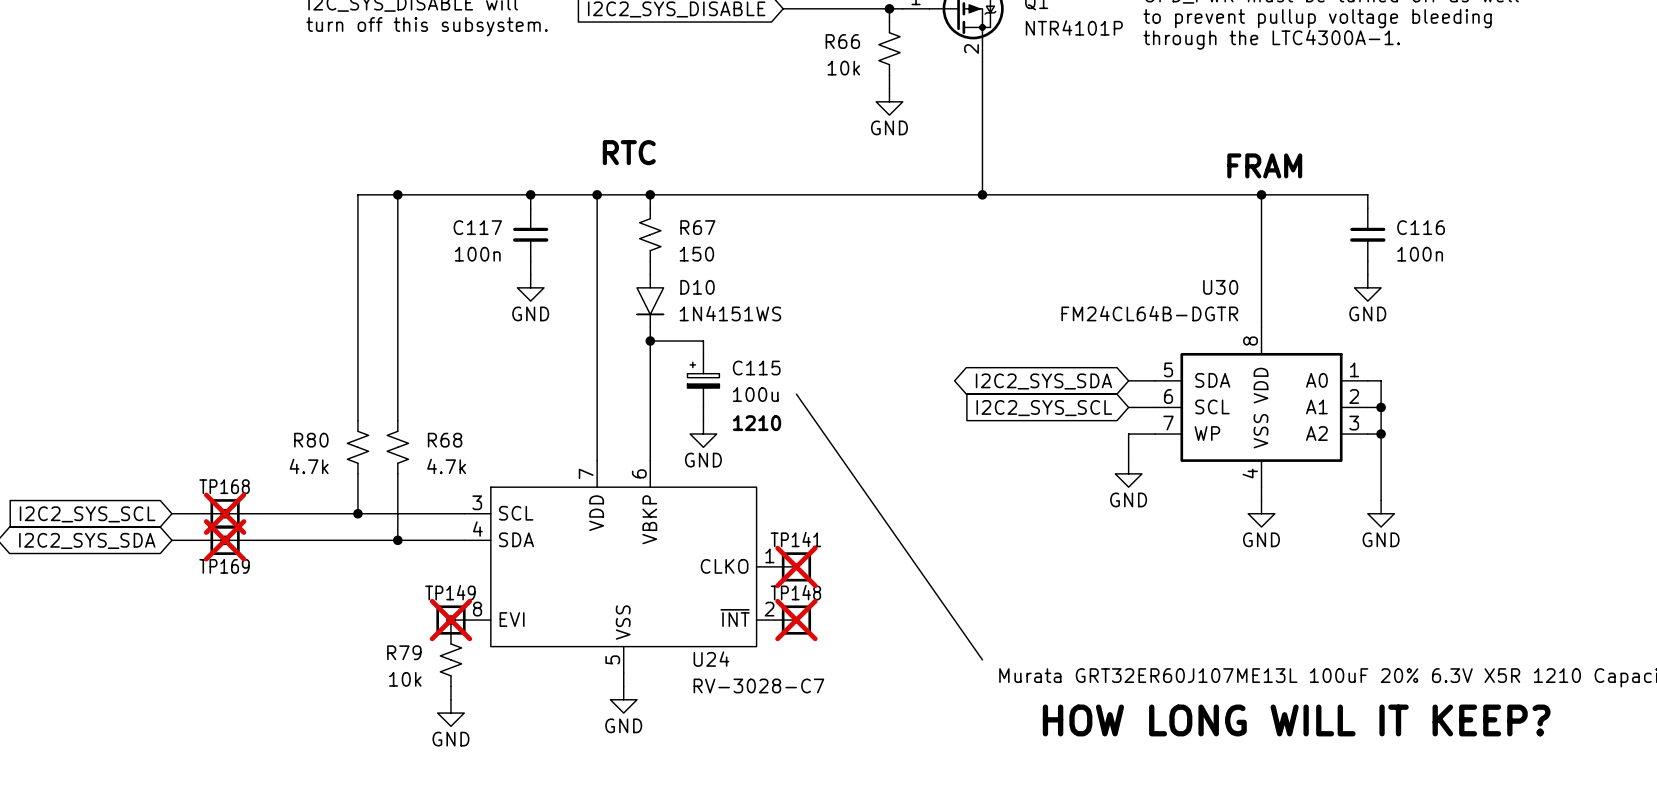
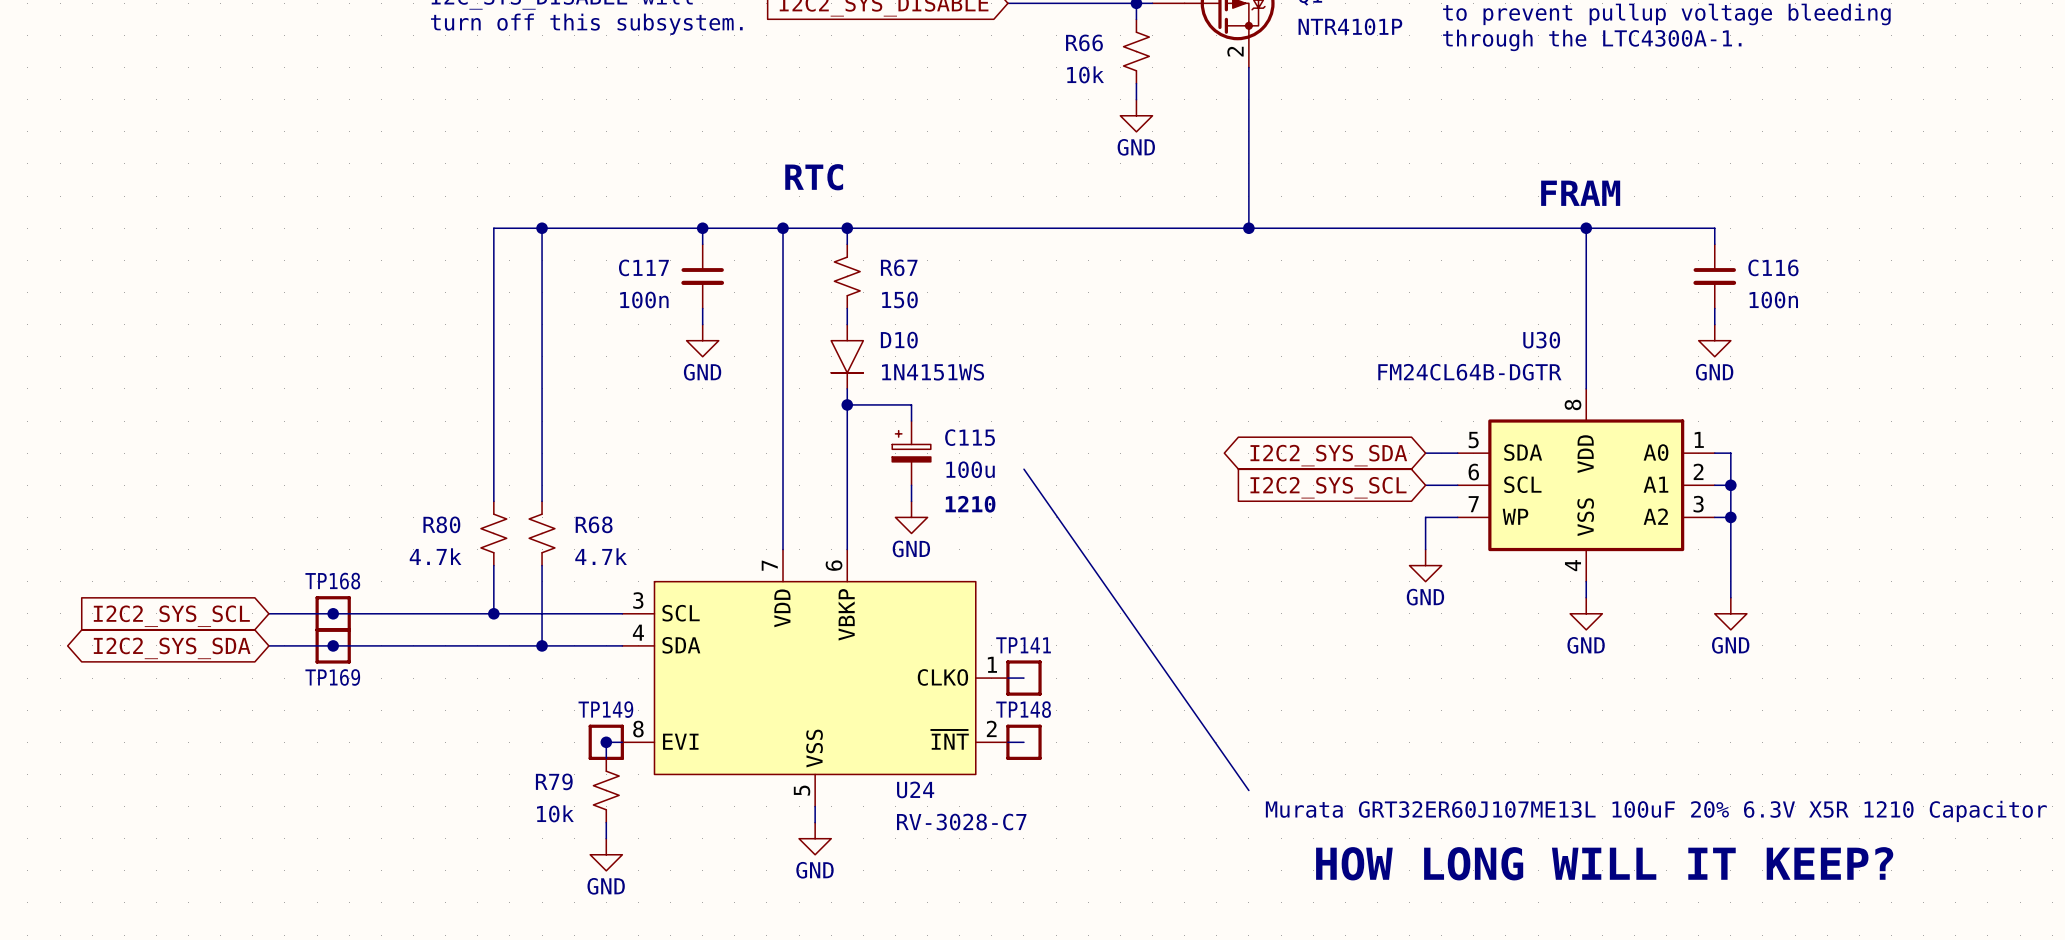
TP168 do-not-place cross: (225, 513) -> none
TP169 do-not-place cross: (225, 540) -> none
TP141 do-not-place cross: (796, 566) -> none
TP149 do-not-place cross: (450, 620) -> none
TP148 do-not-place cross: (796, 620) -> none

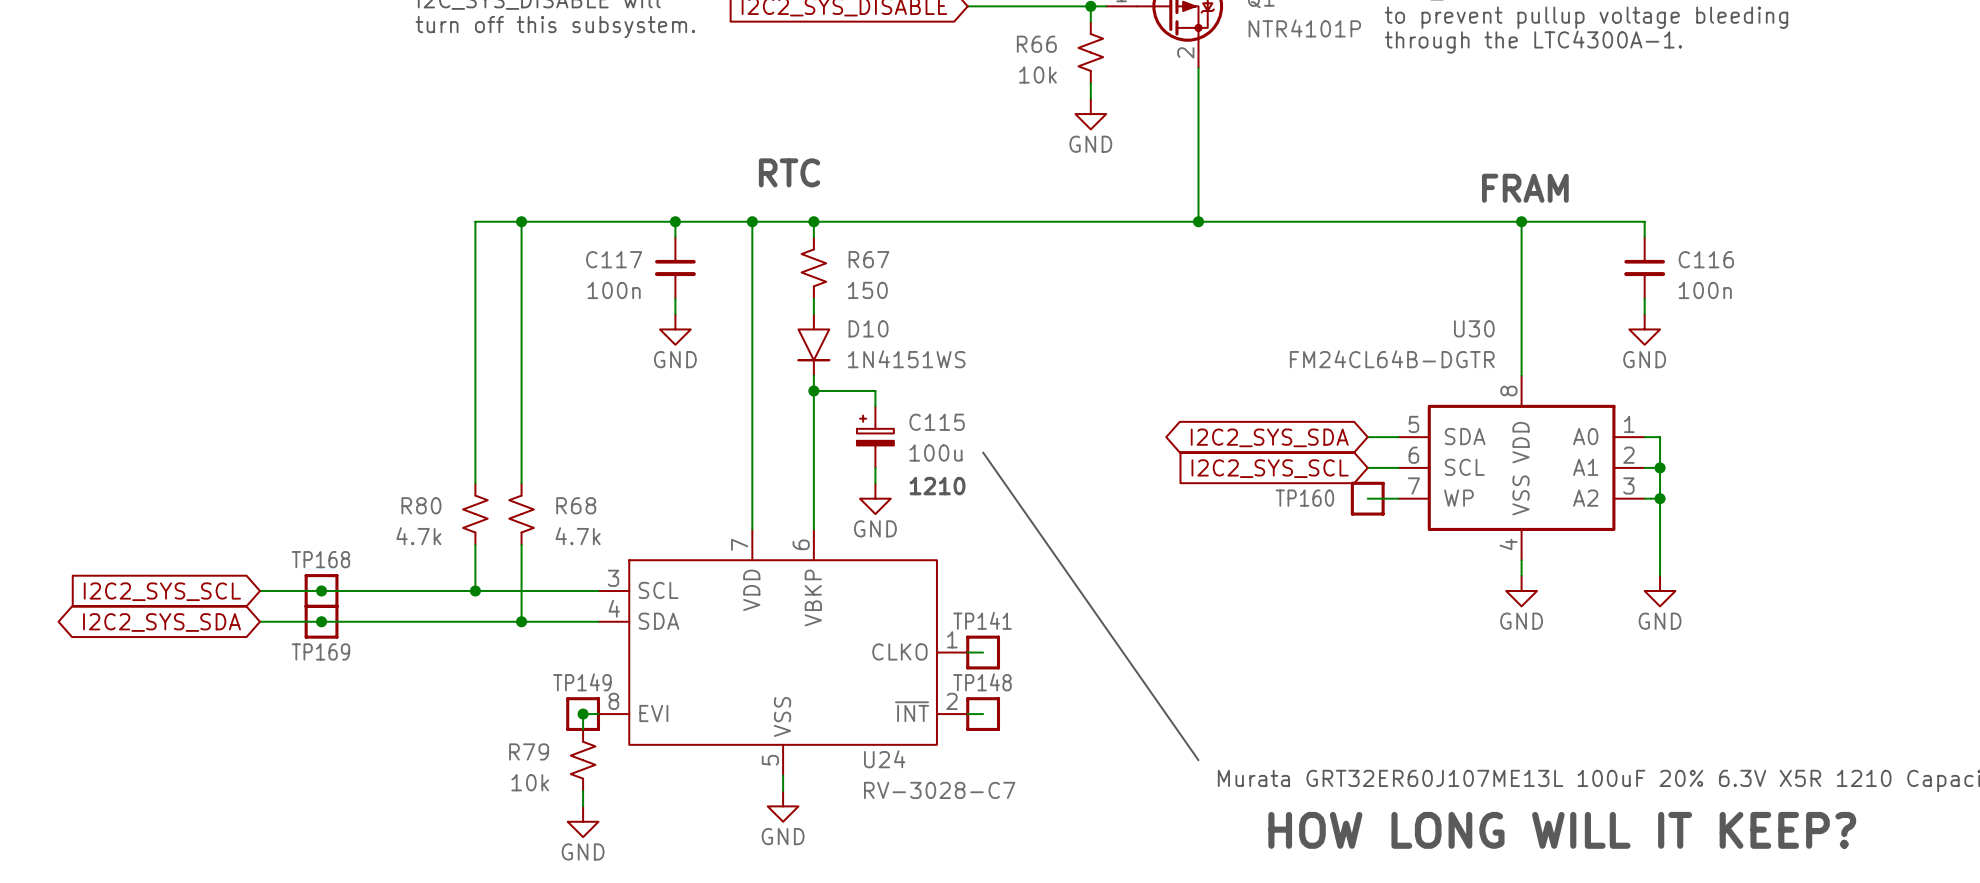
wire: (1425, 517) (1425, 549) -> none
TP160: none -> (1367, 498)
power symbol: GND (1425, 565) -> none

